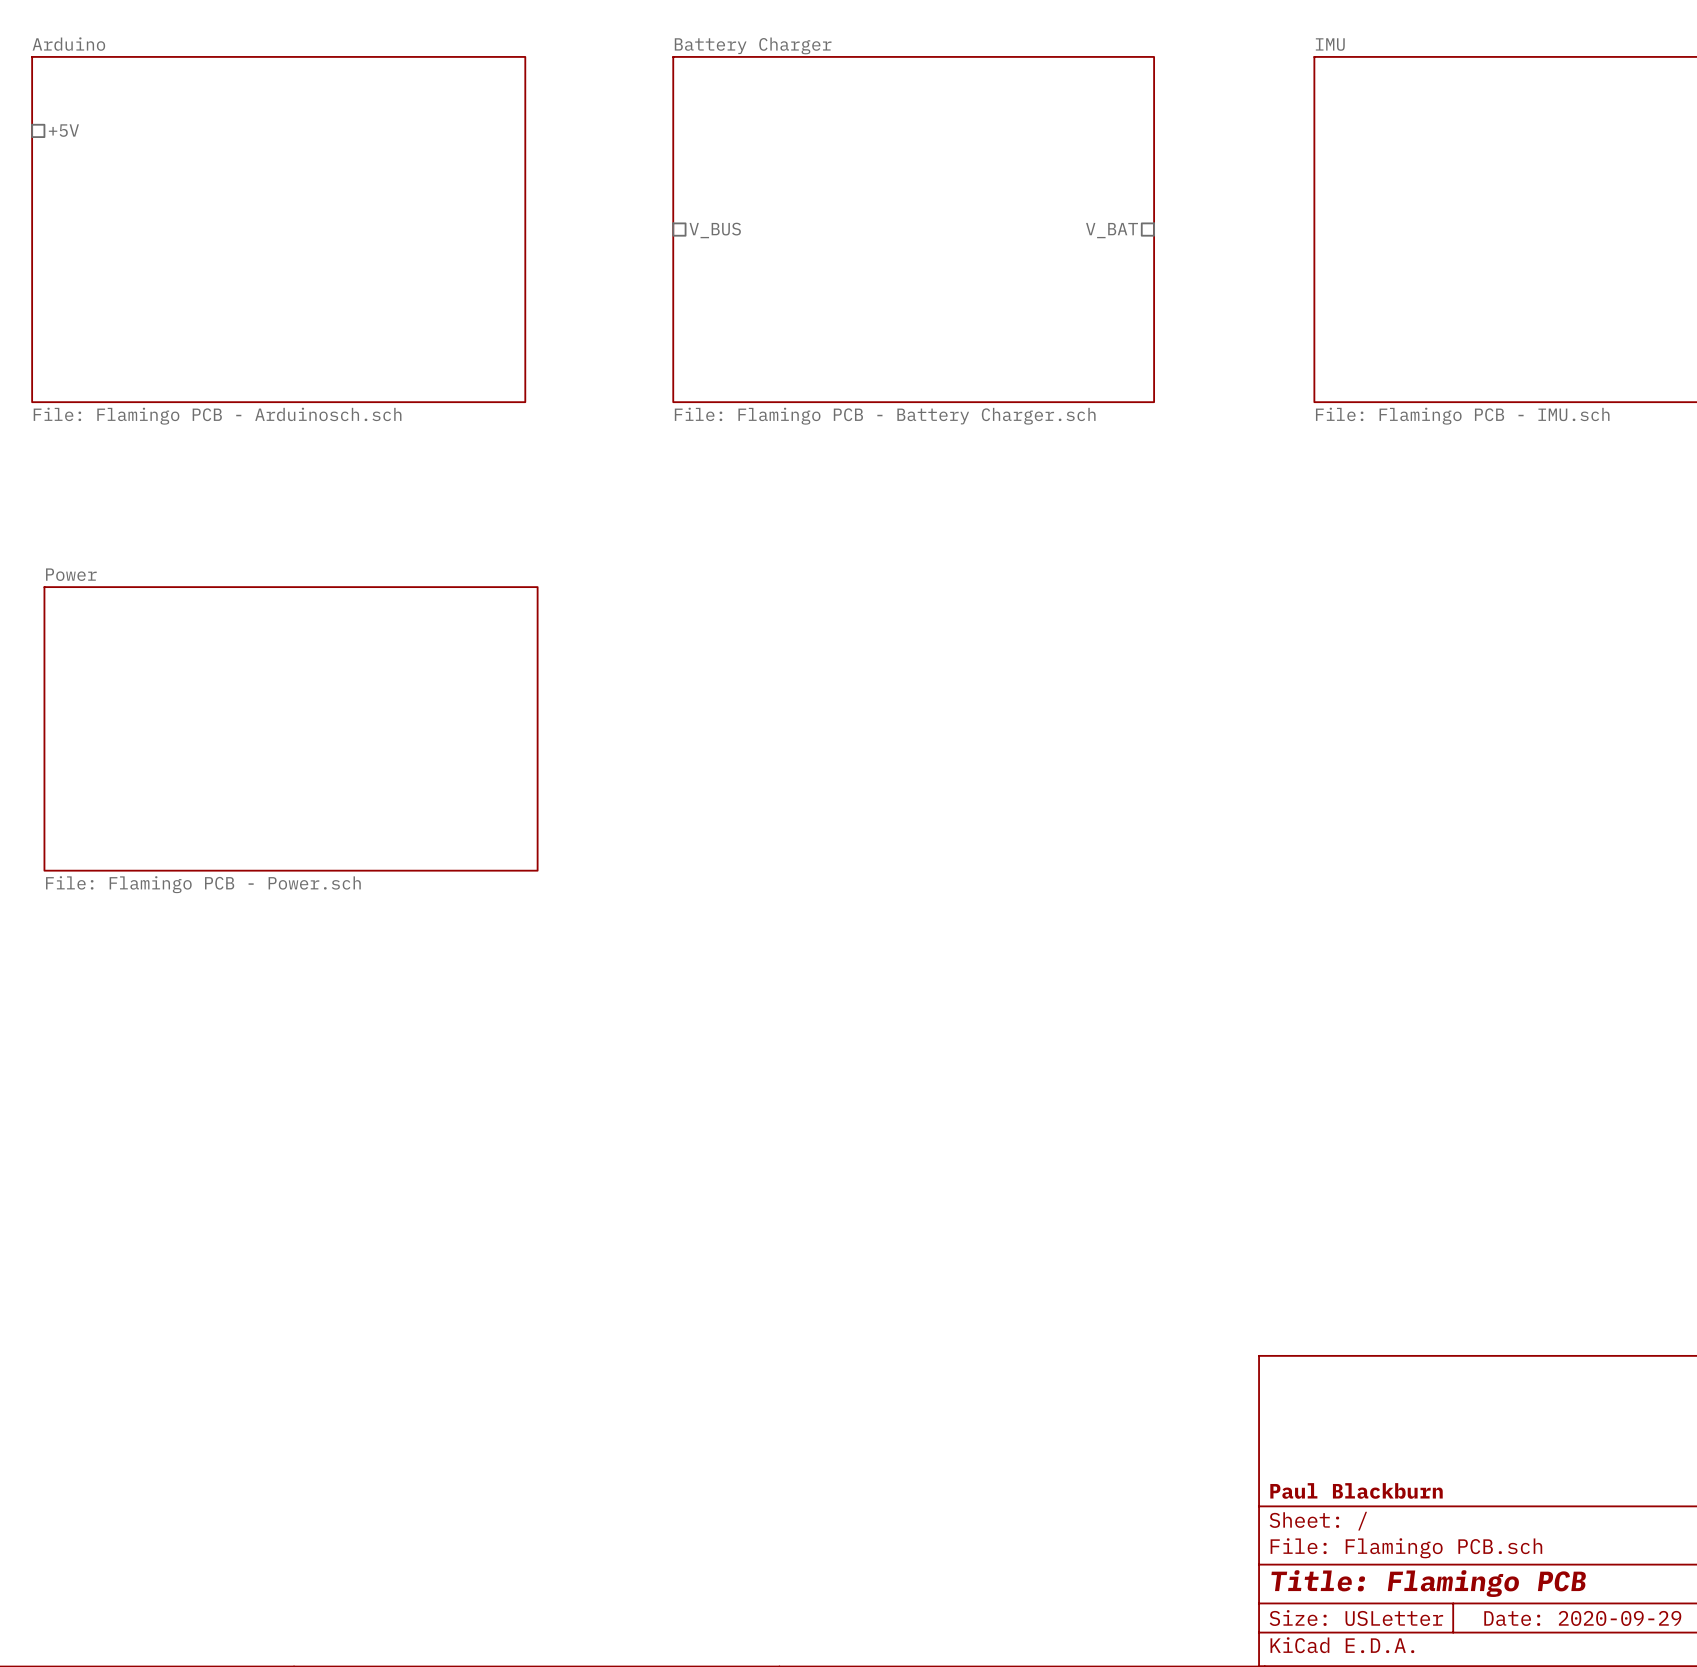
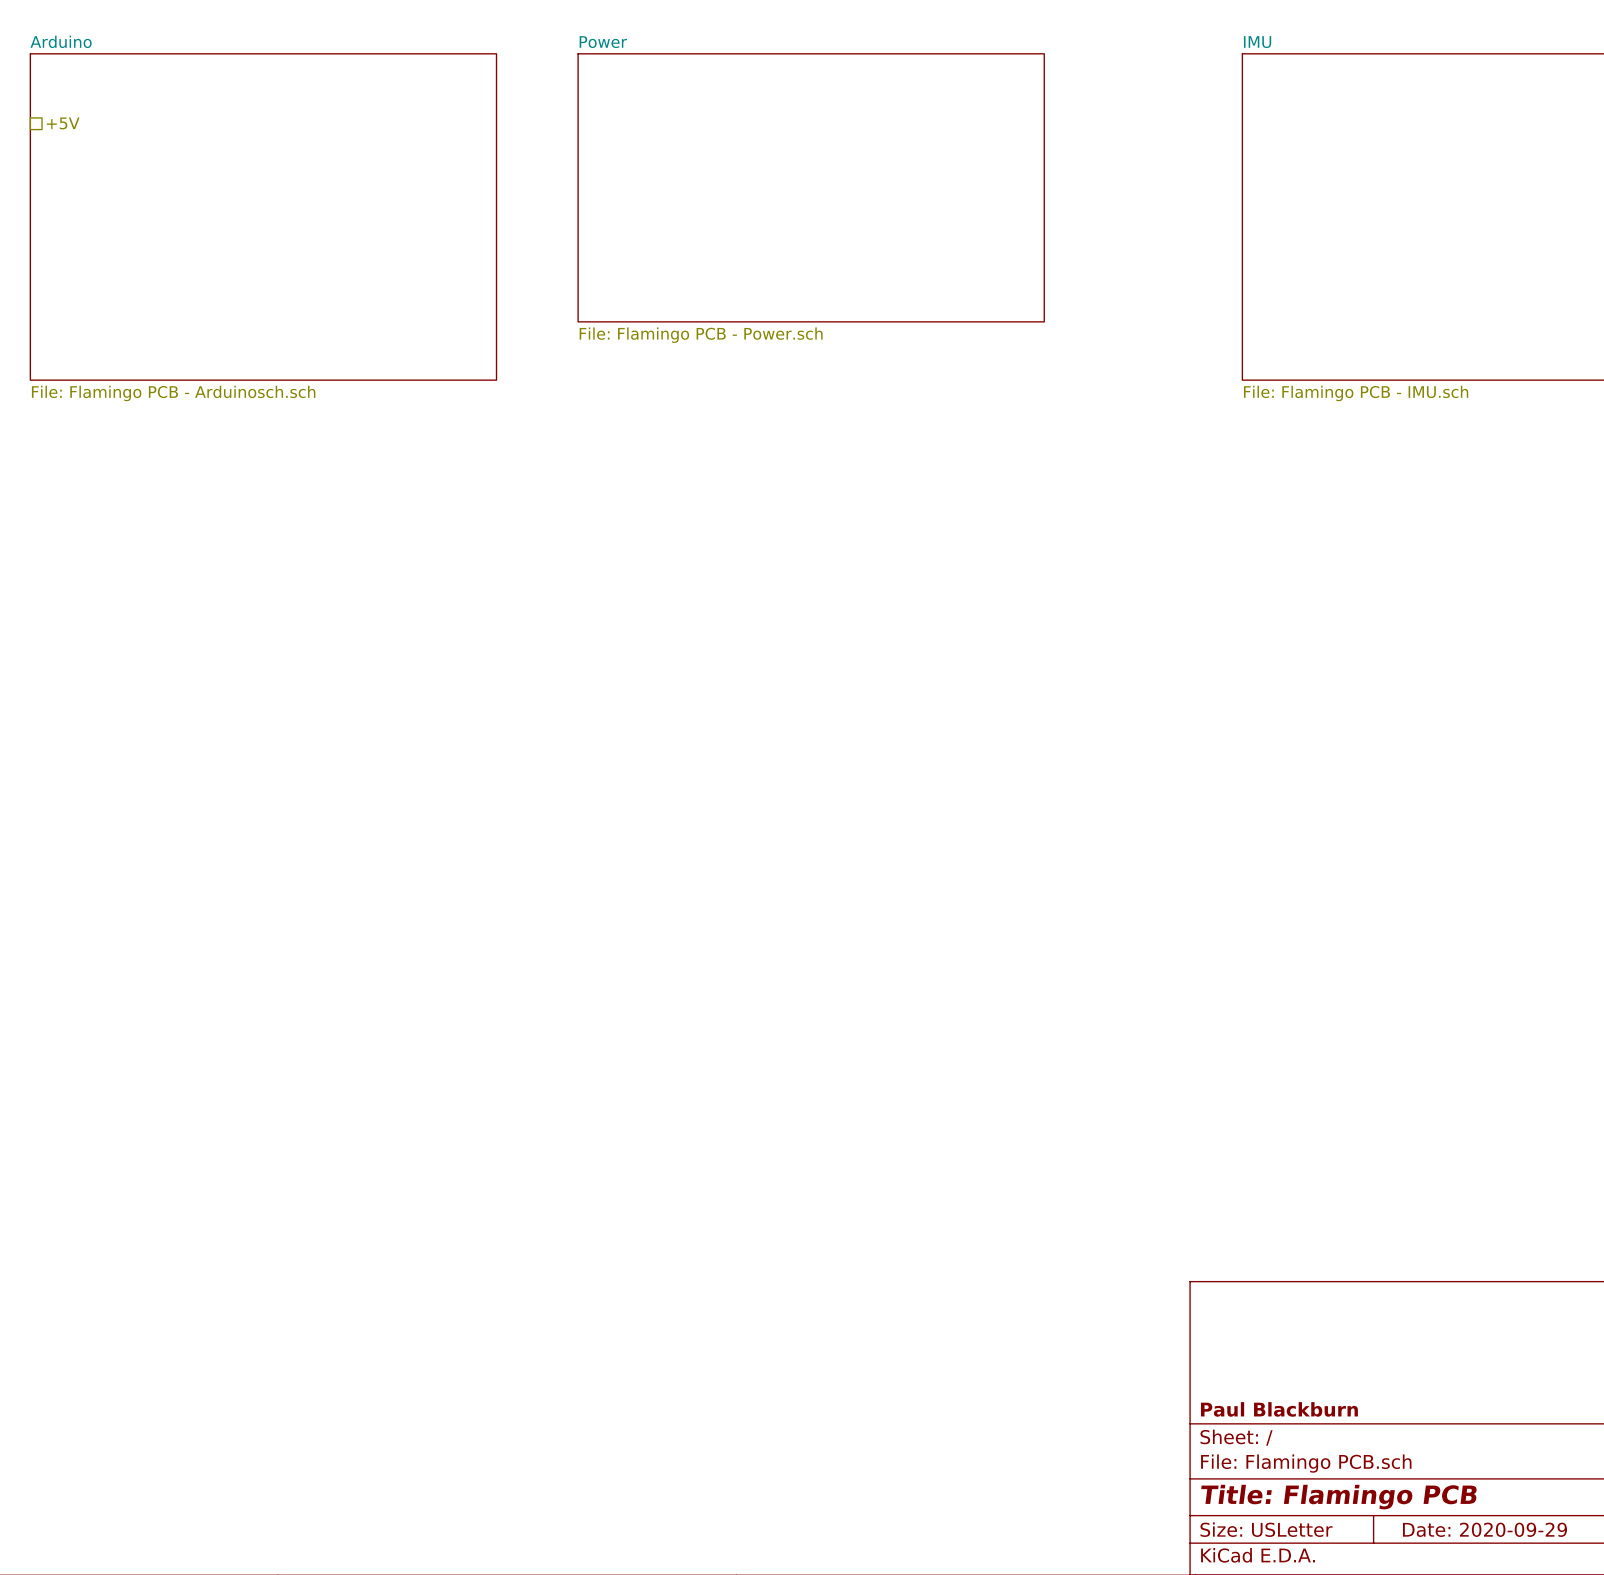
sheet Power: none -> File: Flamingo PCB - Power.sch (811, 187)
sheet Battery Charger: File: Flamingo PCB - Battery Charger.sch (913, 229) -> none
sheet pin: V_BUS (715, 230) -> none
sheet pin: V_BAT (1112, 230) -> none
sheet Power: File: Flamingo PCB - Power.sch (291, 728) -> none

